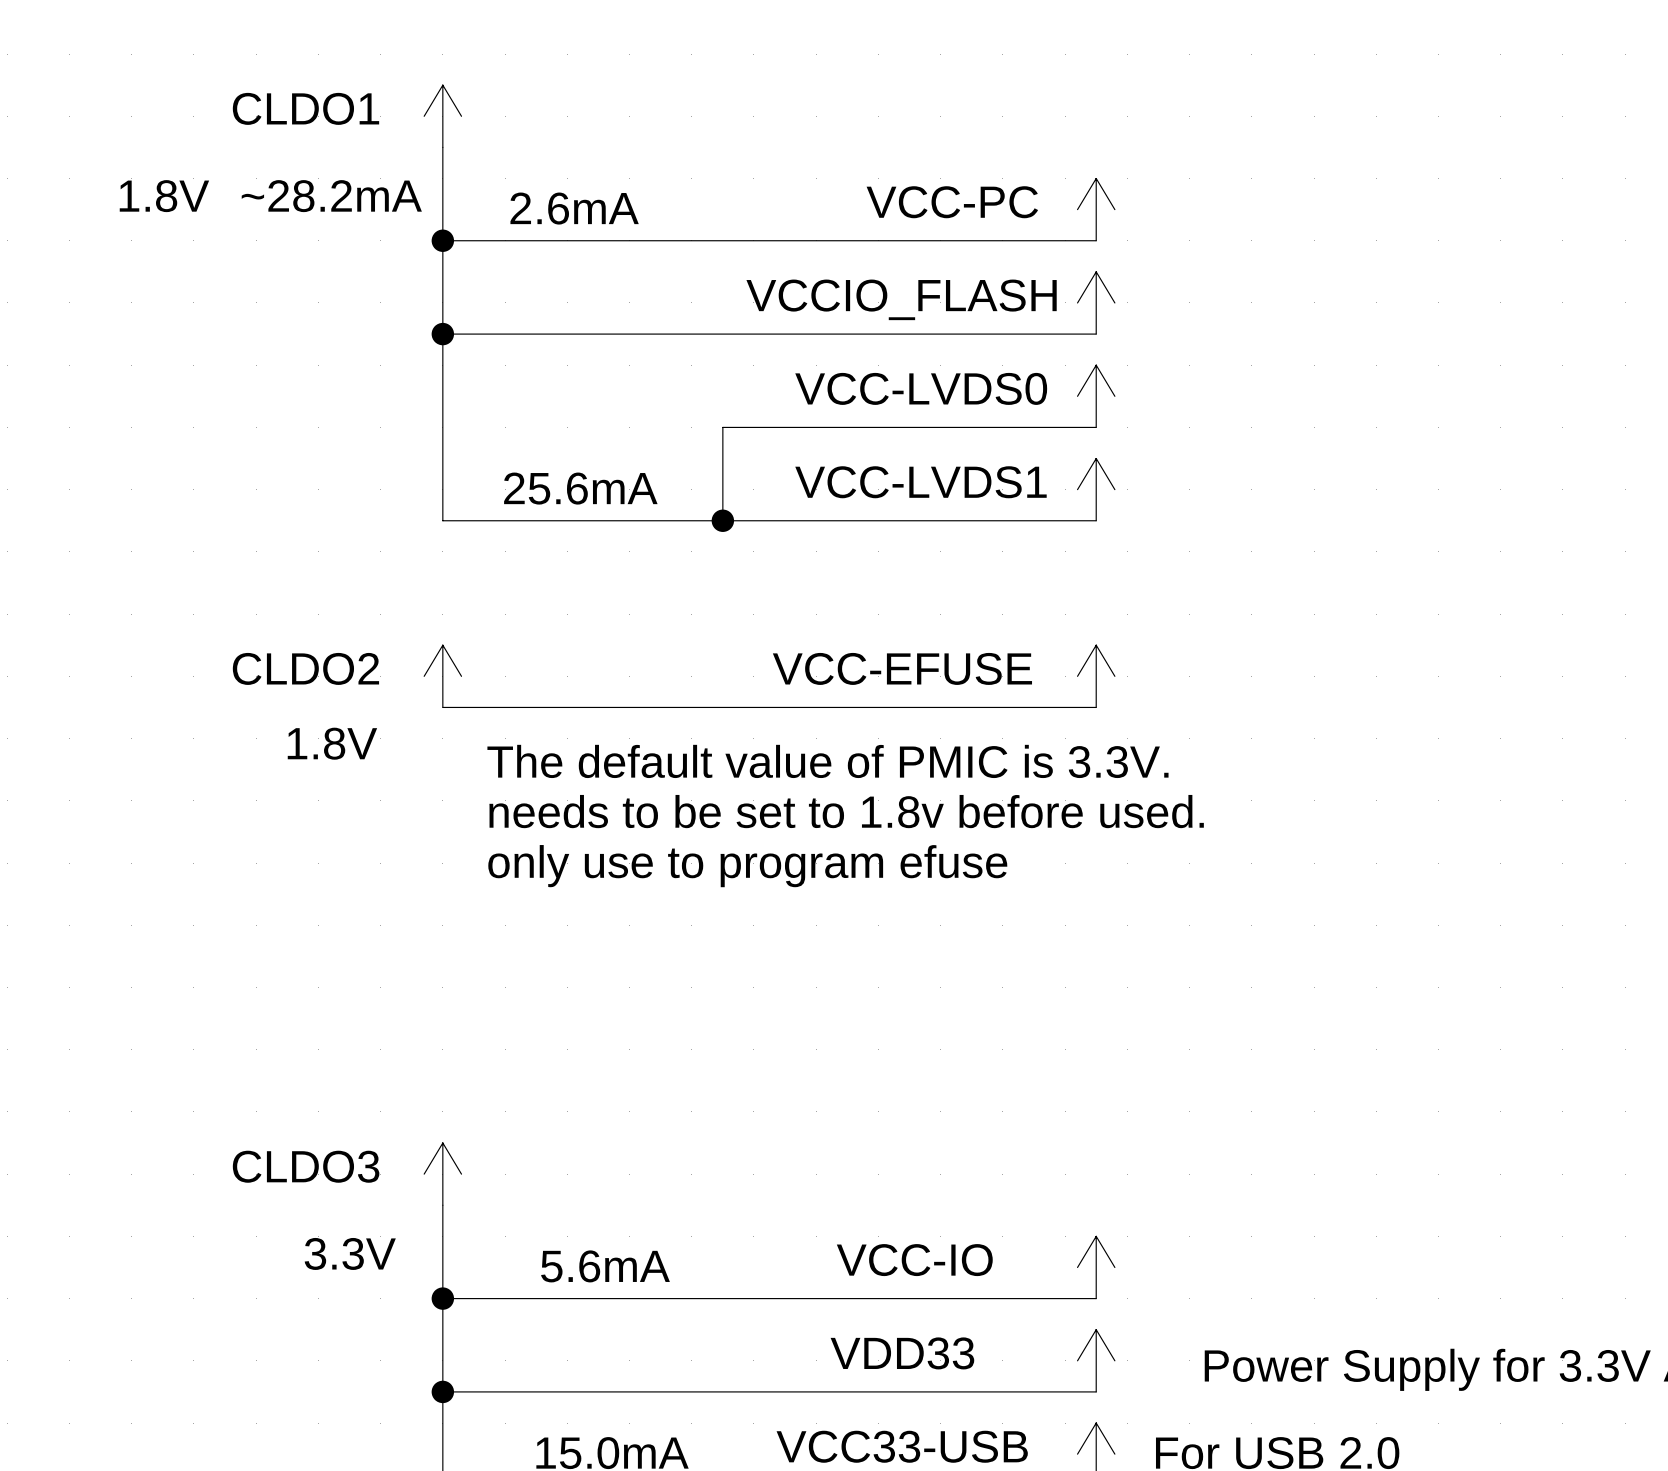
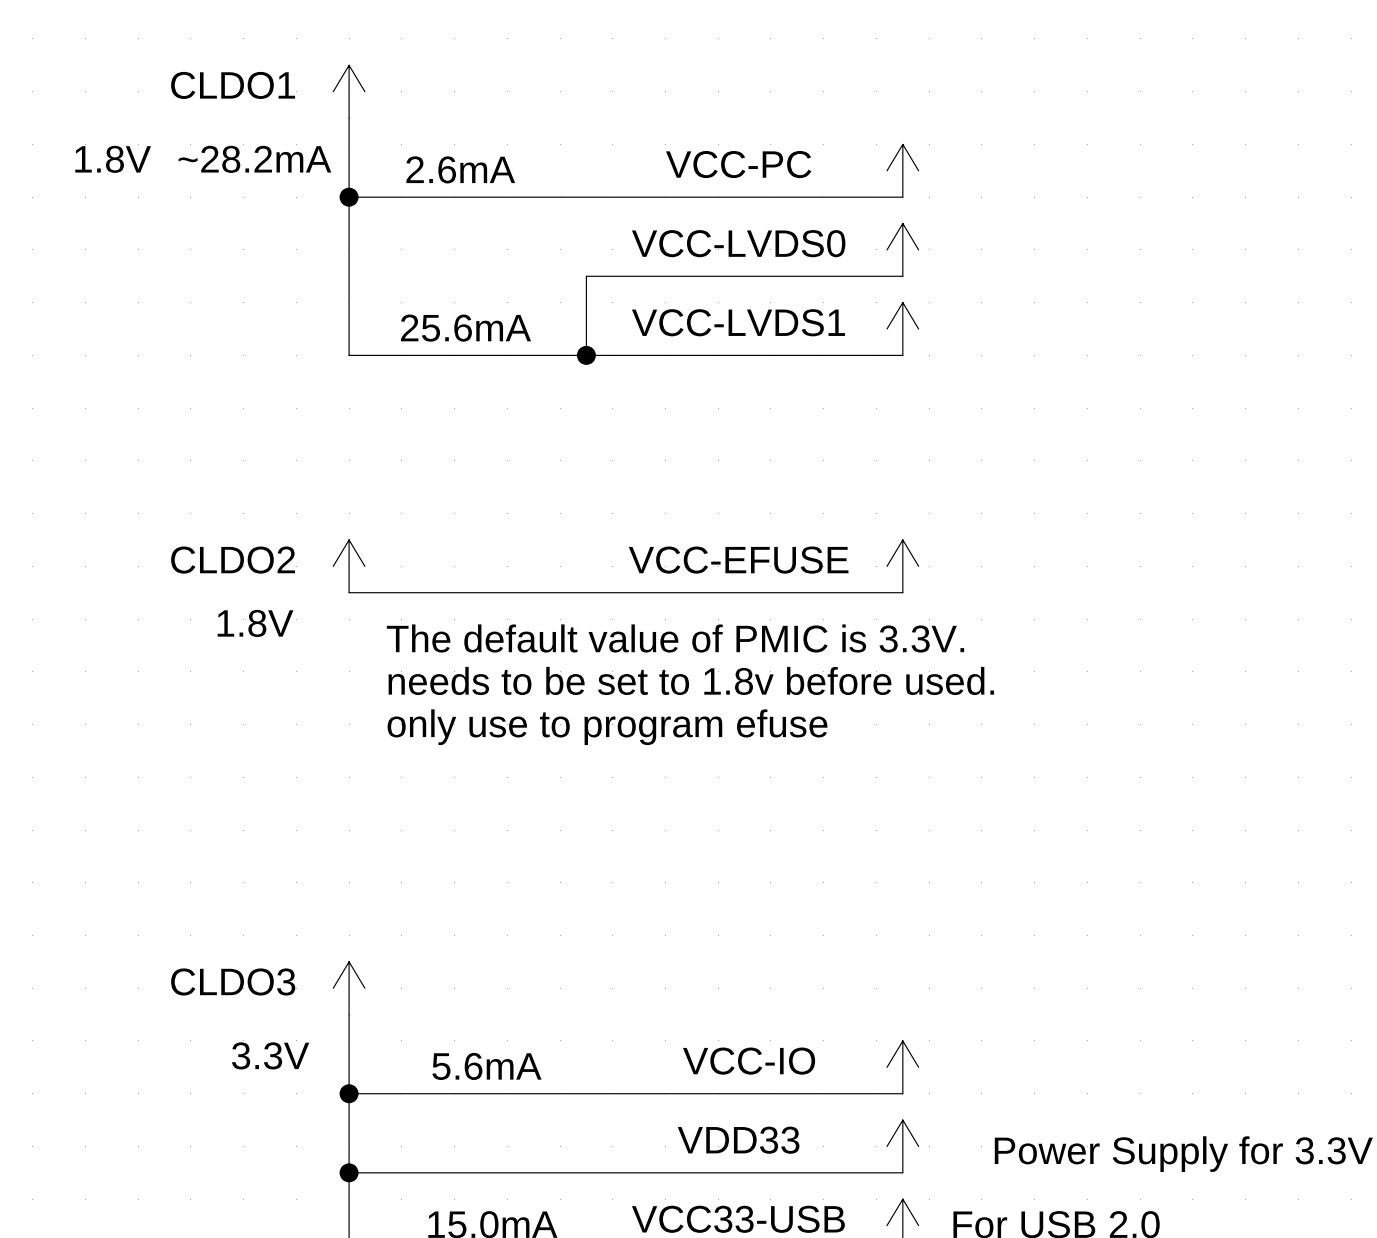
power symbol text position: VCC-PC (952, 202) -> VCC-PC (738, 164)
power symbol: VCCIO_FLASH (1096, 302) -> VCC-LVDS0 (902, 249)
wire: (442, 334) (722, 334) -> (349, 355) (586, 355) (586, 276)
junction: (442, 334) -> none
power symbol: VCC-LVDS0 (1096, 396) -> VCC-LVDS1 (902, 329)
wire: (442, 427) (442, 520) (1096, 520) -> none
wire: (722, 427) (722, 520) -> none
text position: 25.6mA (580, 488) -> 25.6mA (466, 328)
power symbol: VCC-LVDS1 (1096, 489) -> none
junction position: (722, 520) -> (586, 355)

